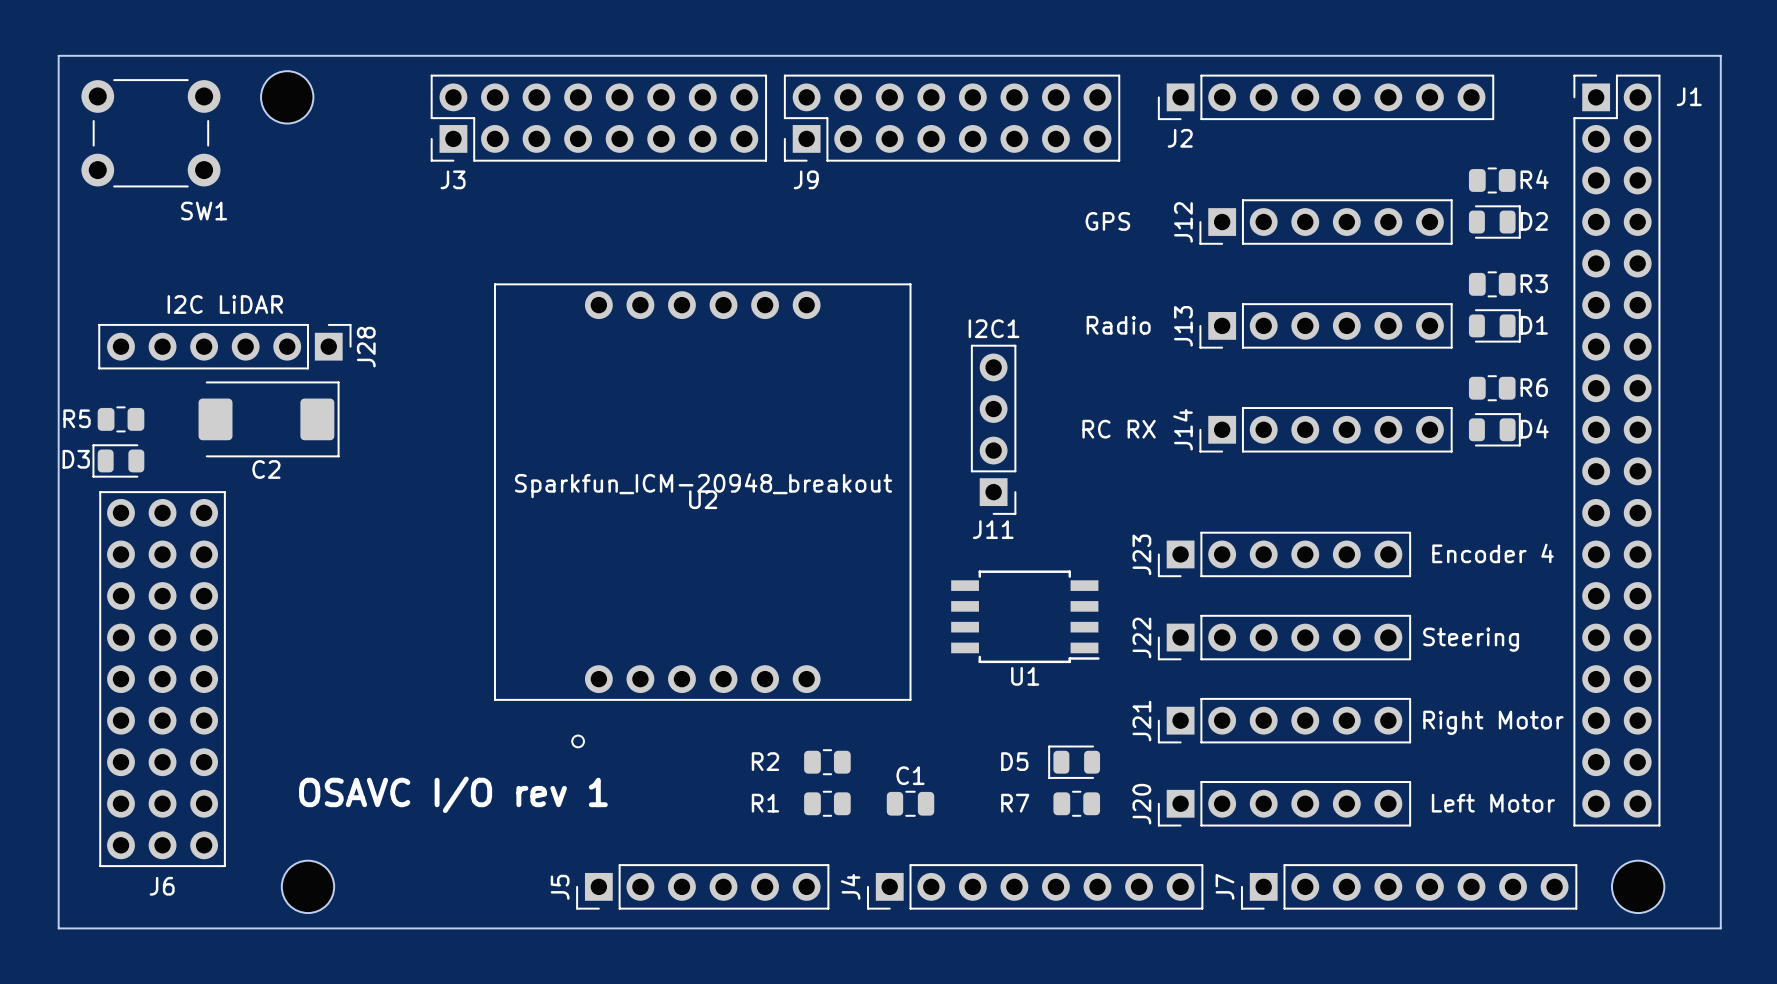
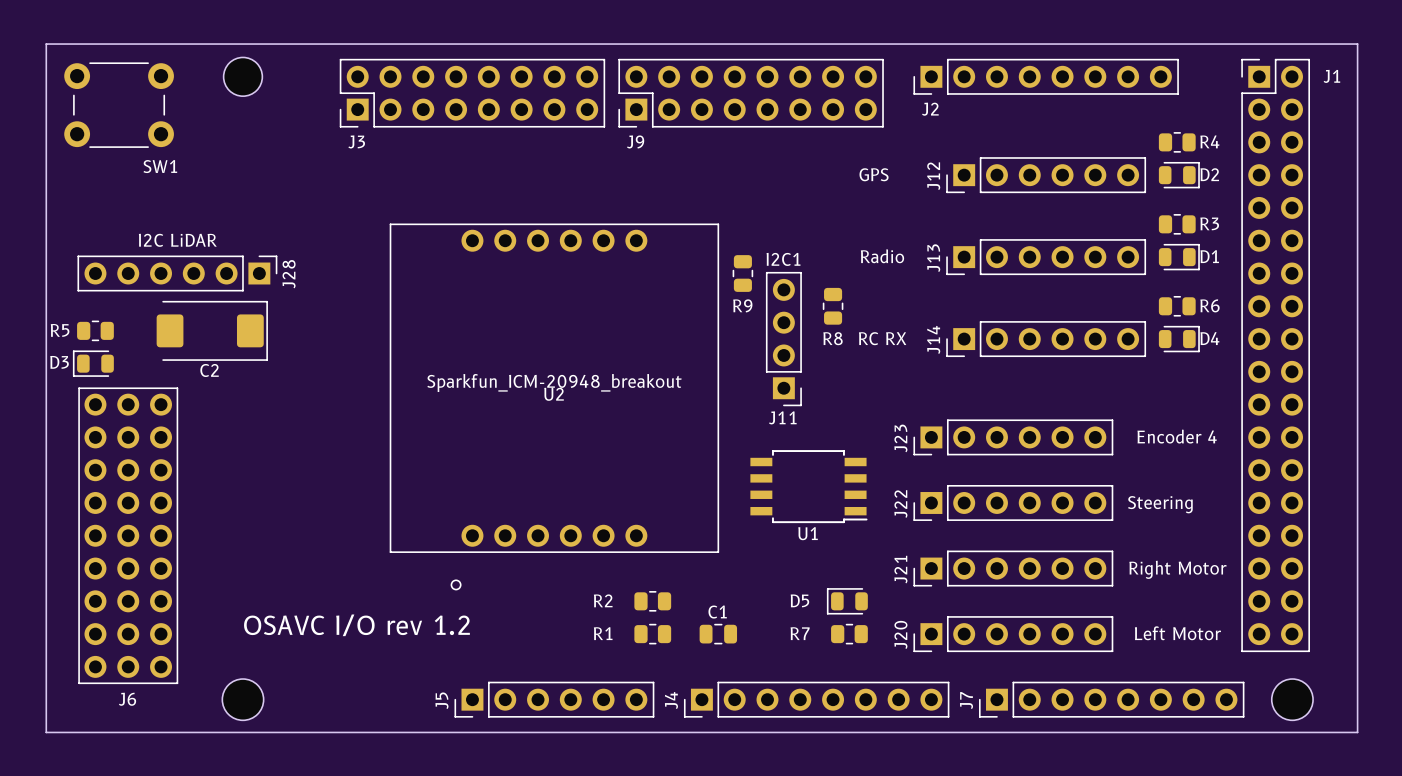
part: (287, 97) -> none
part: none -> (242, 76)
R9: none -> (742, 273)
R8: none -> (833, 306)
text: OSAVC I/O rev 1 (453, 794) -> OSAVC I/O rev 1.2 (356, 625)

